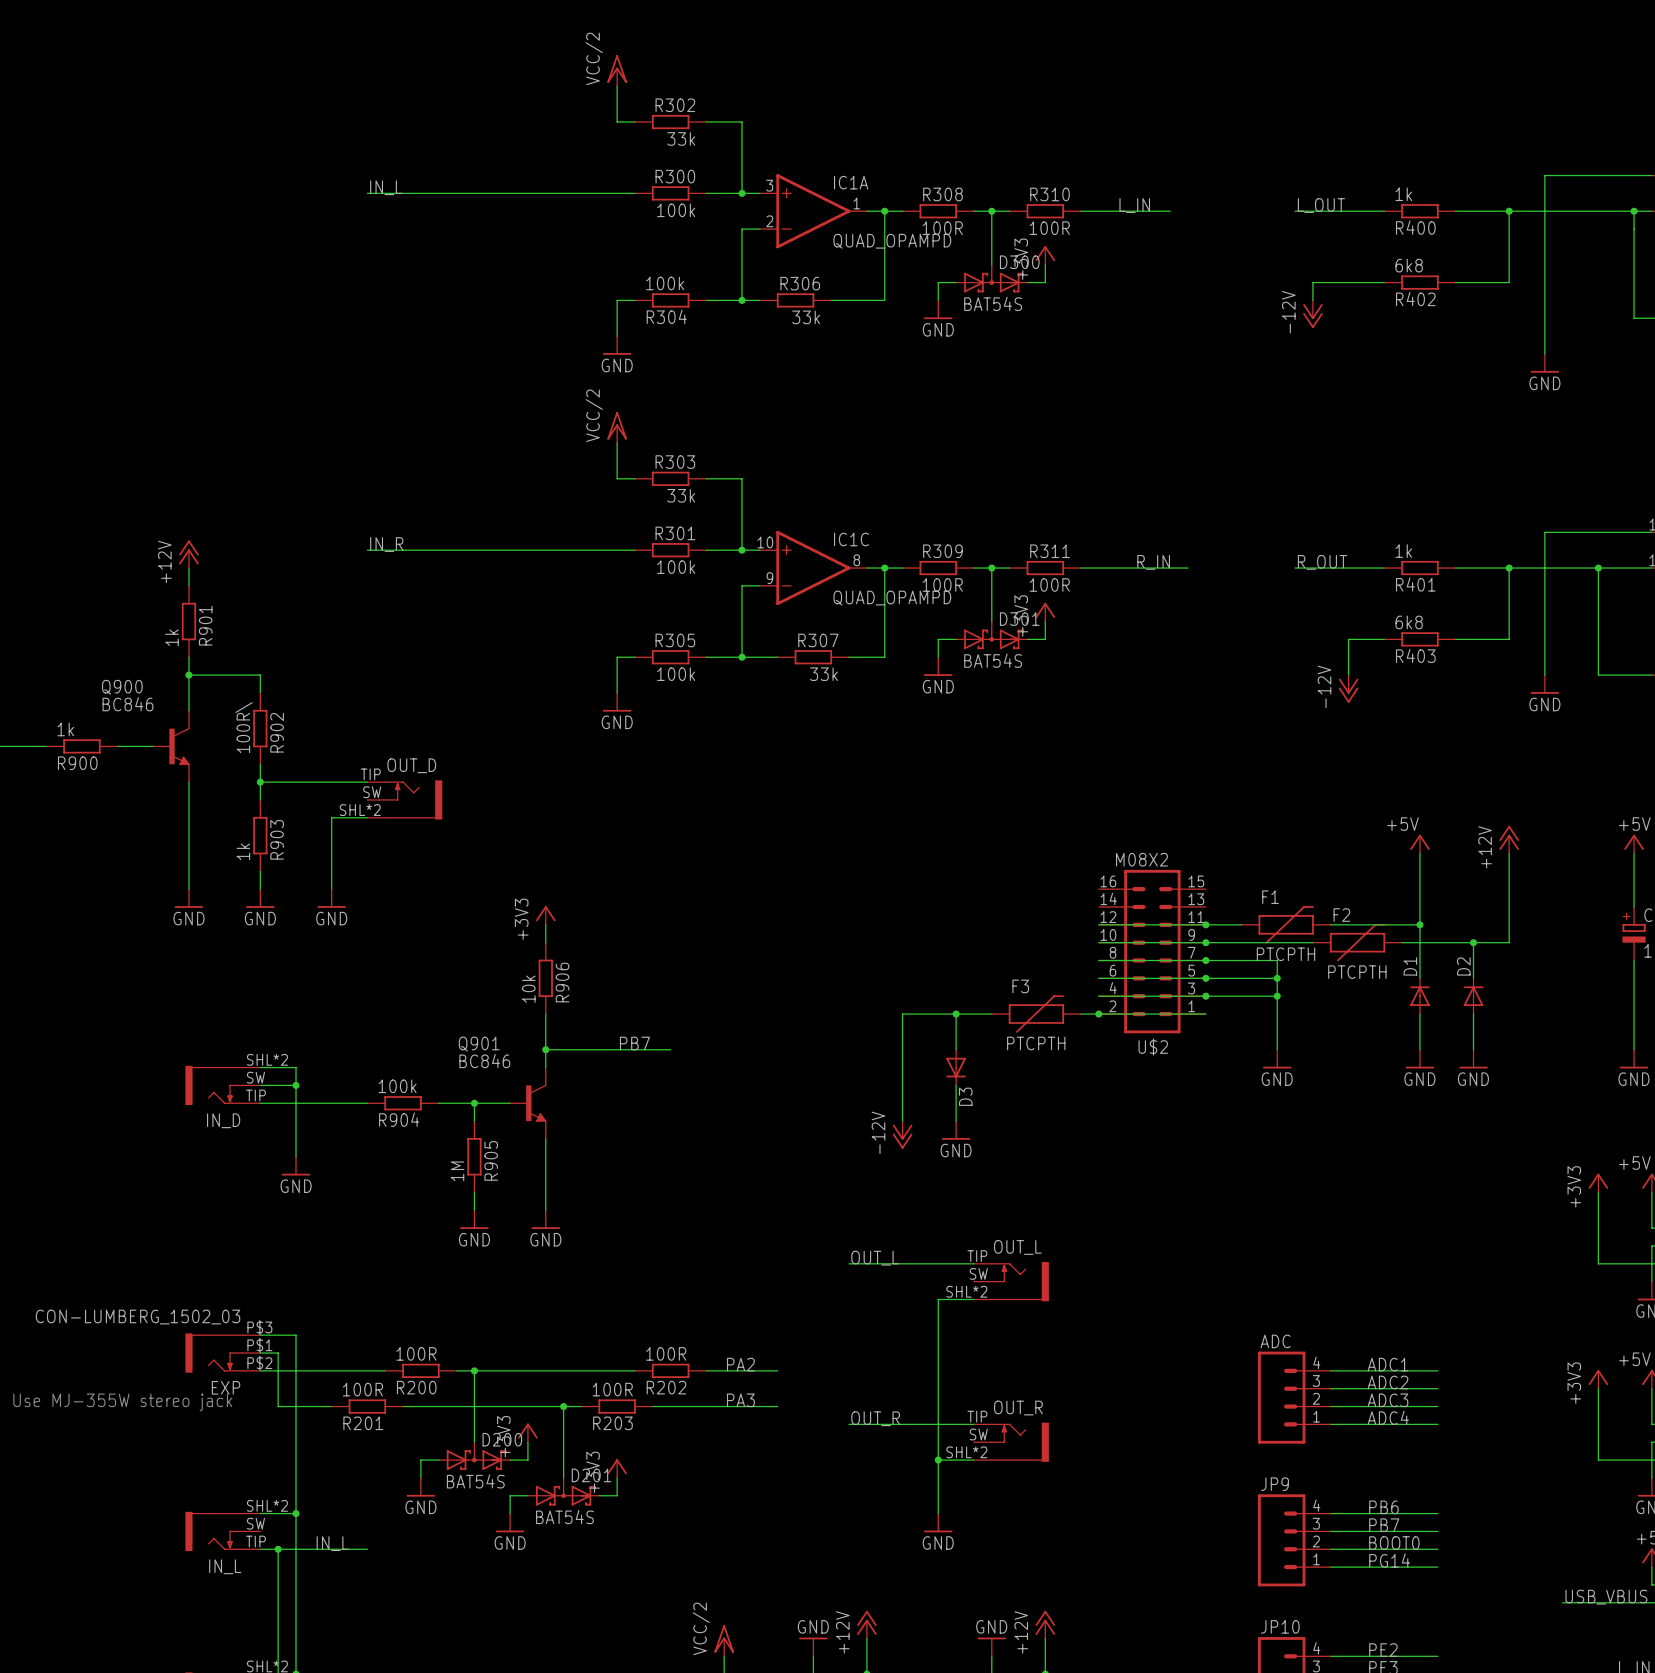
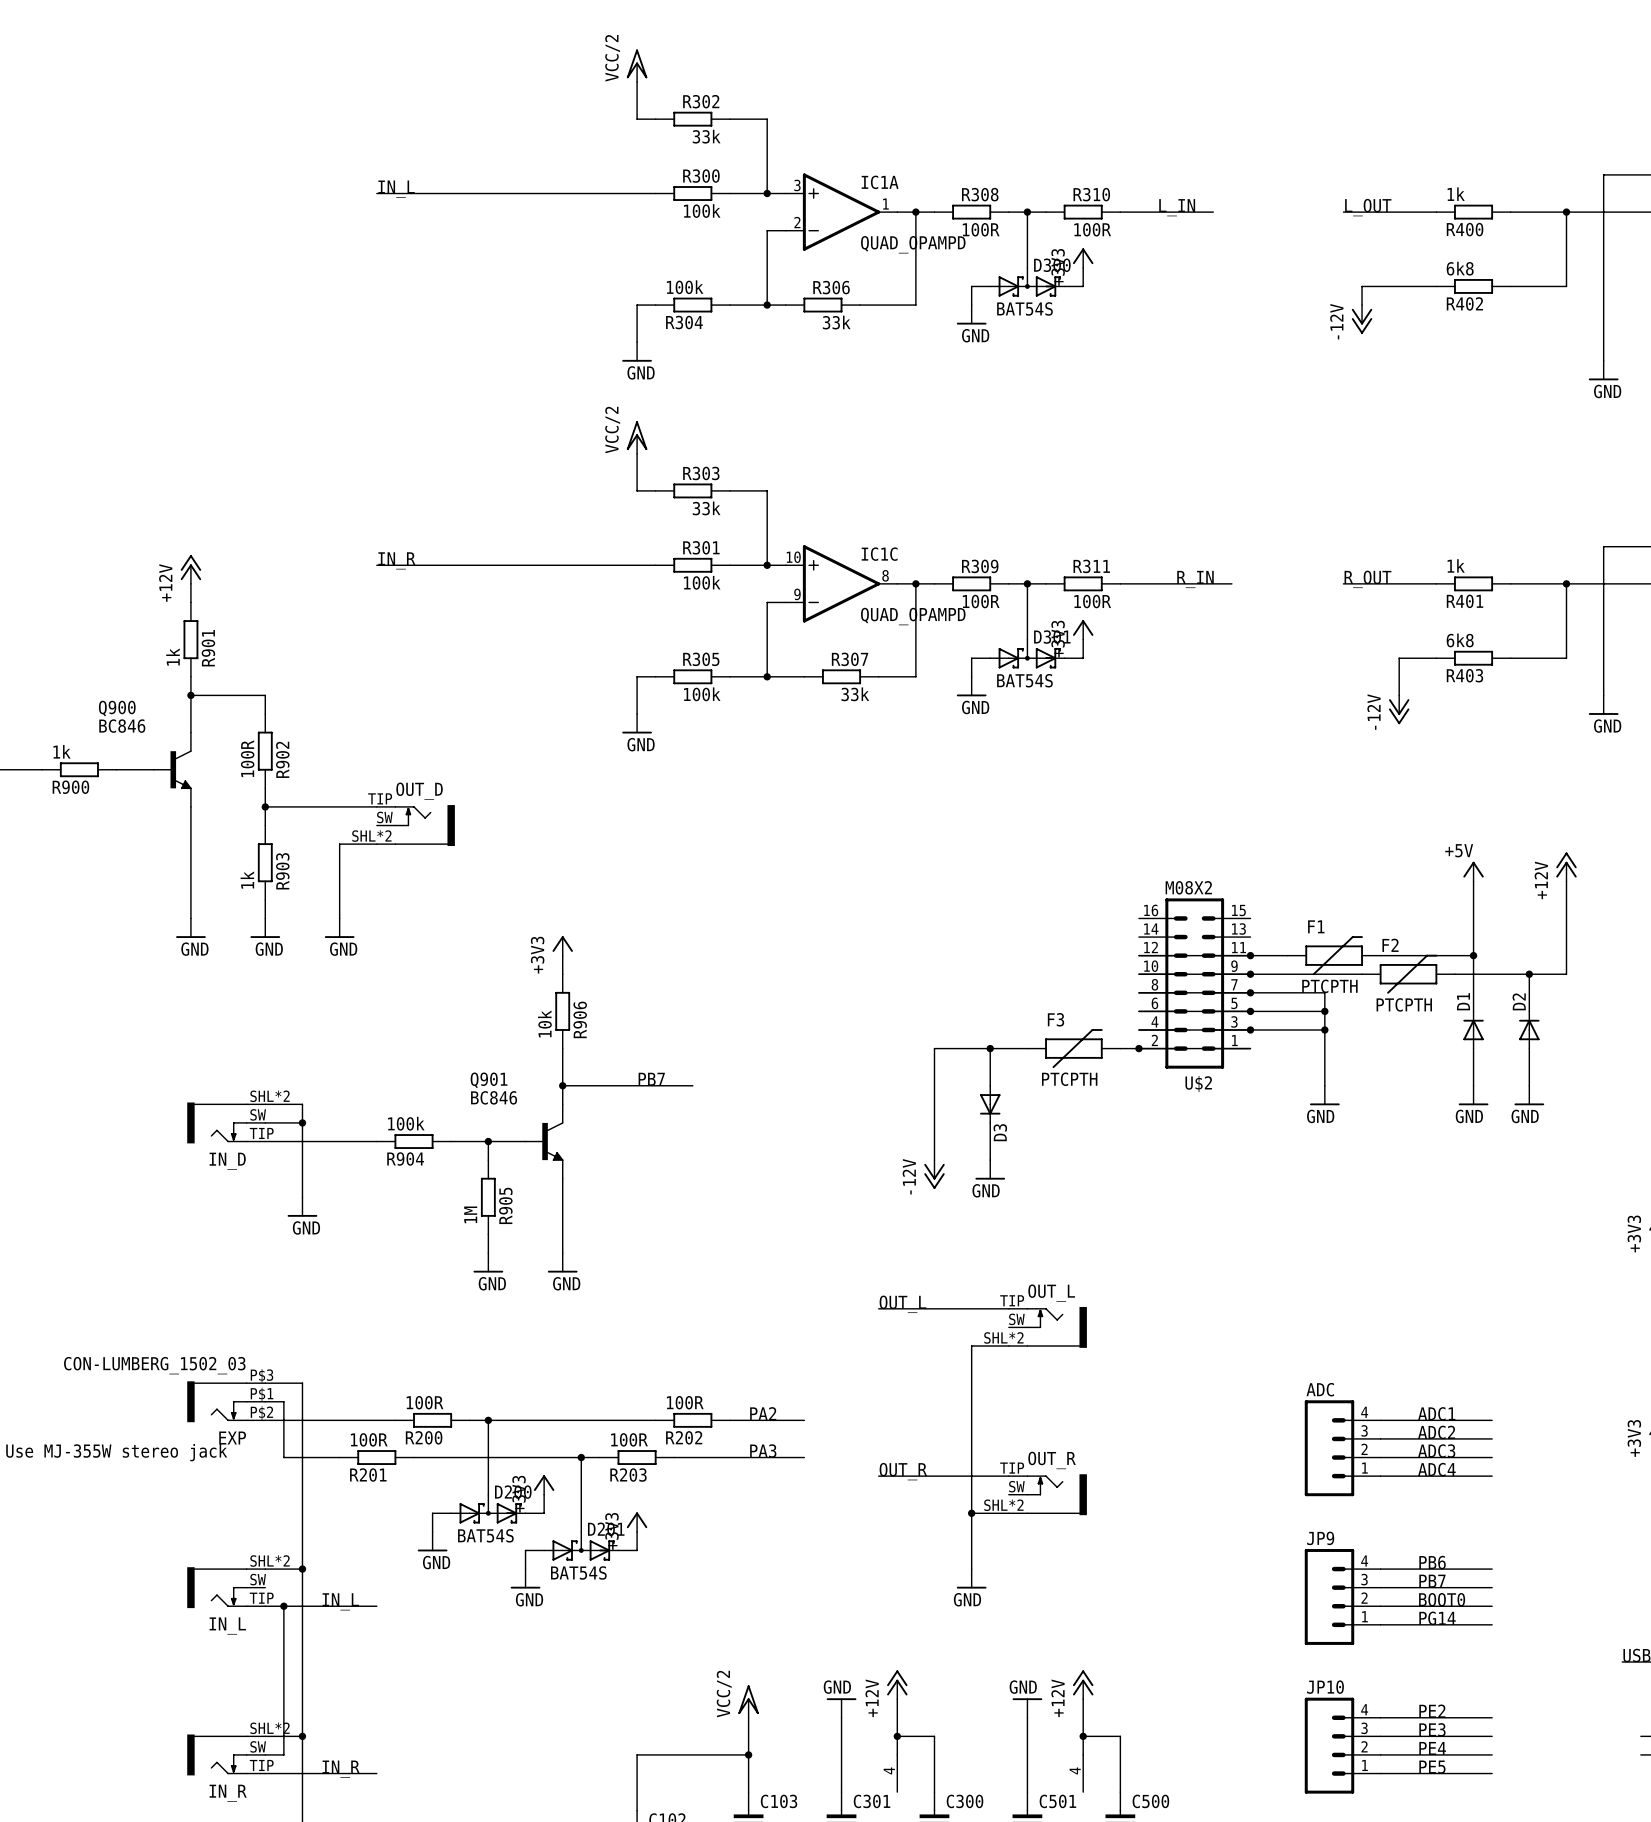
R902 value: 100R\ (243, 727) -> 100R (247, 758)

